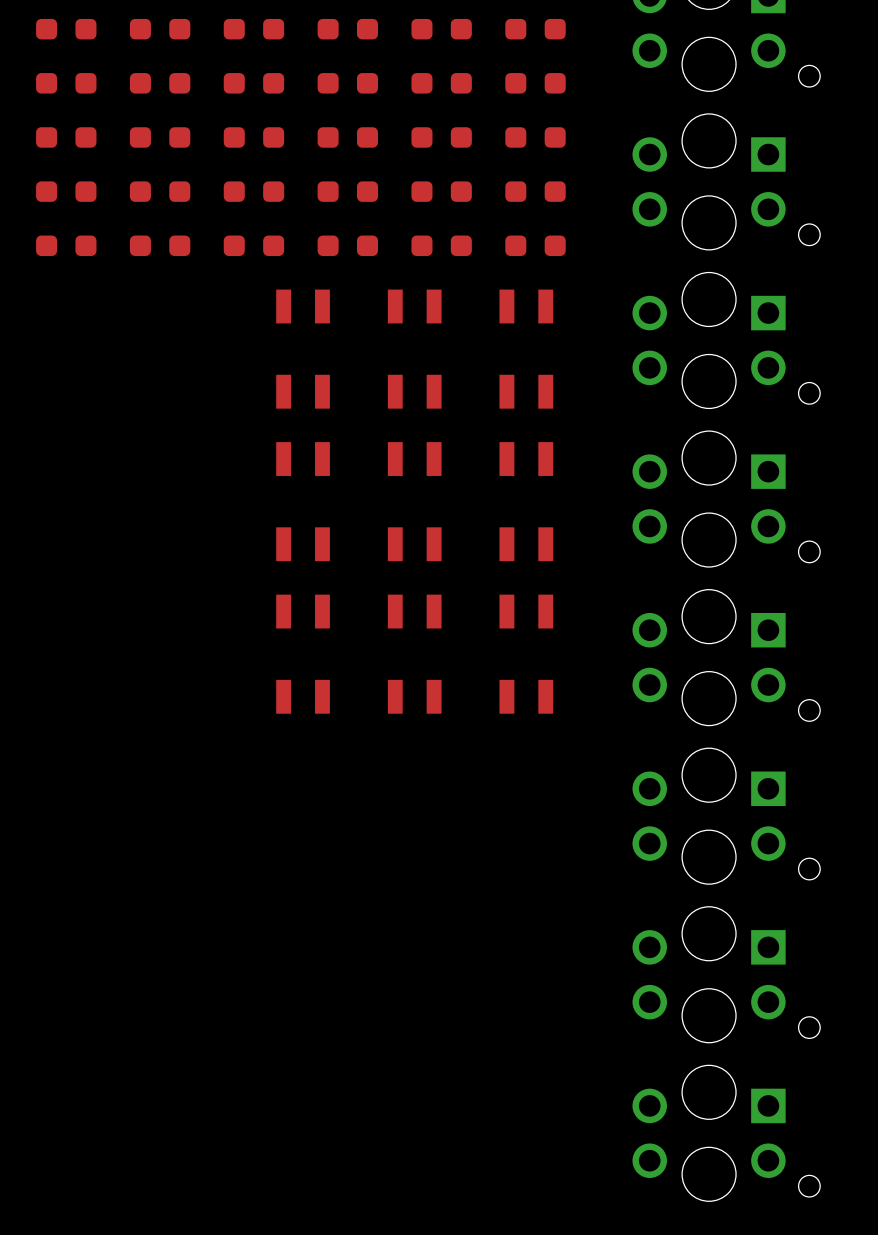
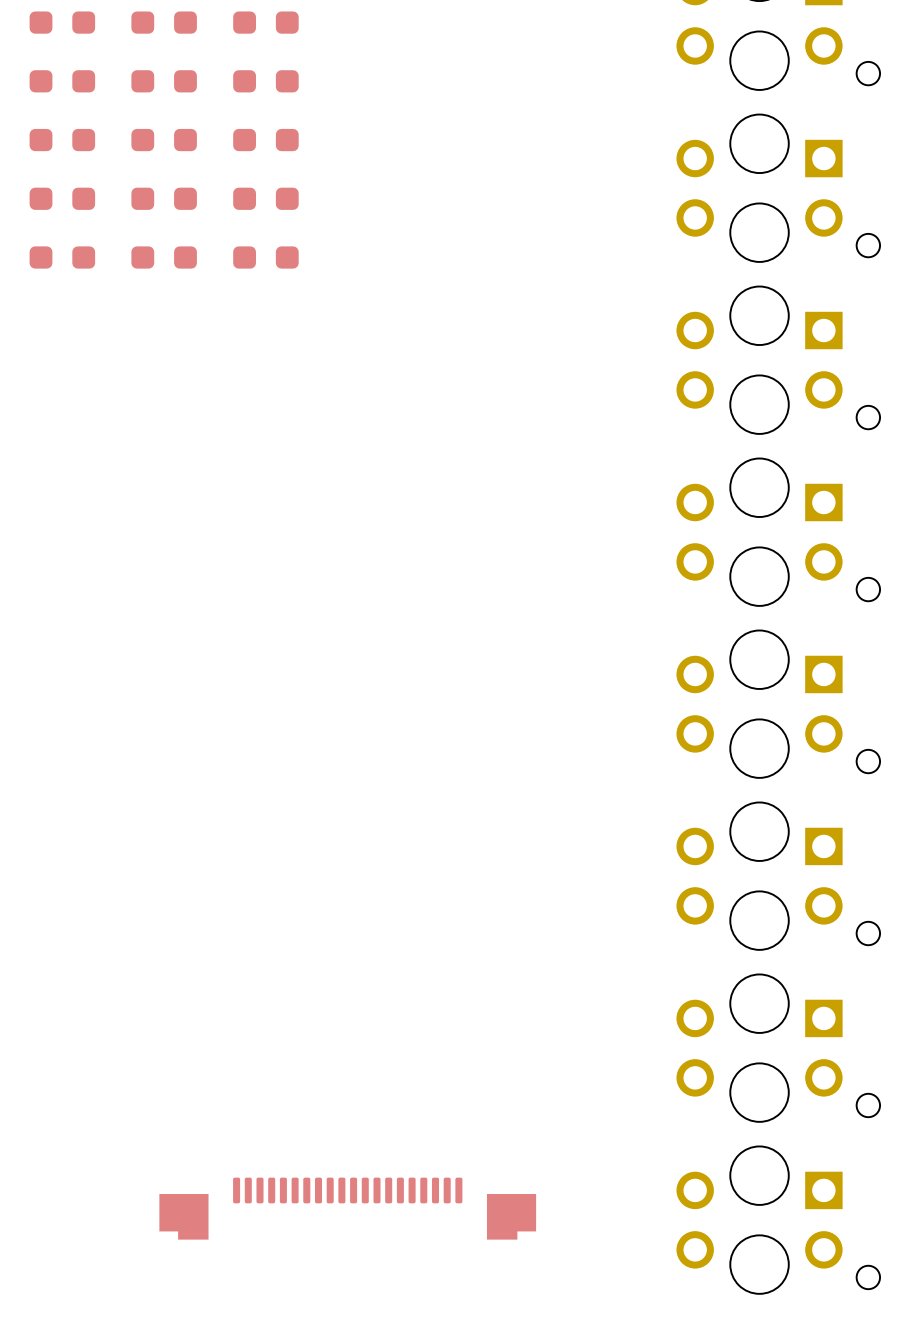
part: (347, 29) -> none
part: (441, 29) -> none
part: (535, 29) -> none
part: (347, 83) -> none
part: (441, 83) -> none
part: (535, 83) -> none
part: (347, 137) -> none
part: (441, 137) -> none
part: (535, 137) -> none
part: (347, 191) -> none
part: (441, 191) -> none
part: (535, 191) -> none
part: (347, 245) -> none
part: (441, 245) -> none
part: (535, 245) -> none
part: (303, 349) -> none
part: (414, 349) -> none
part: (526, 349) -> none
part: (303, 501) -> none
part: (414, 501) -> none
part: (526, 501) -> none
part: (303, 654) -> none
part: (414, 654) -> none
part: (526, 654) -> none
part: none -> (347, 1208)

